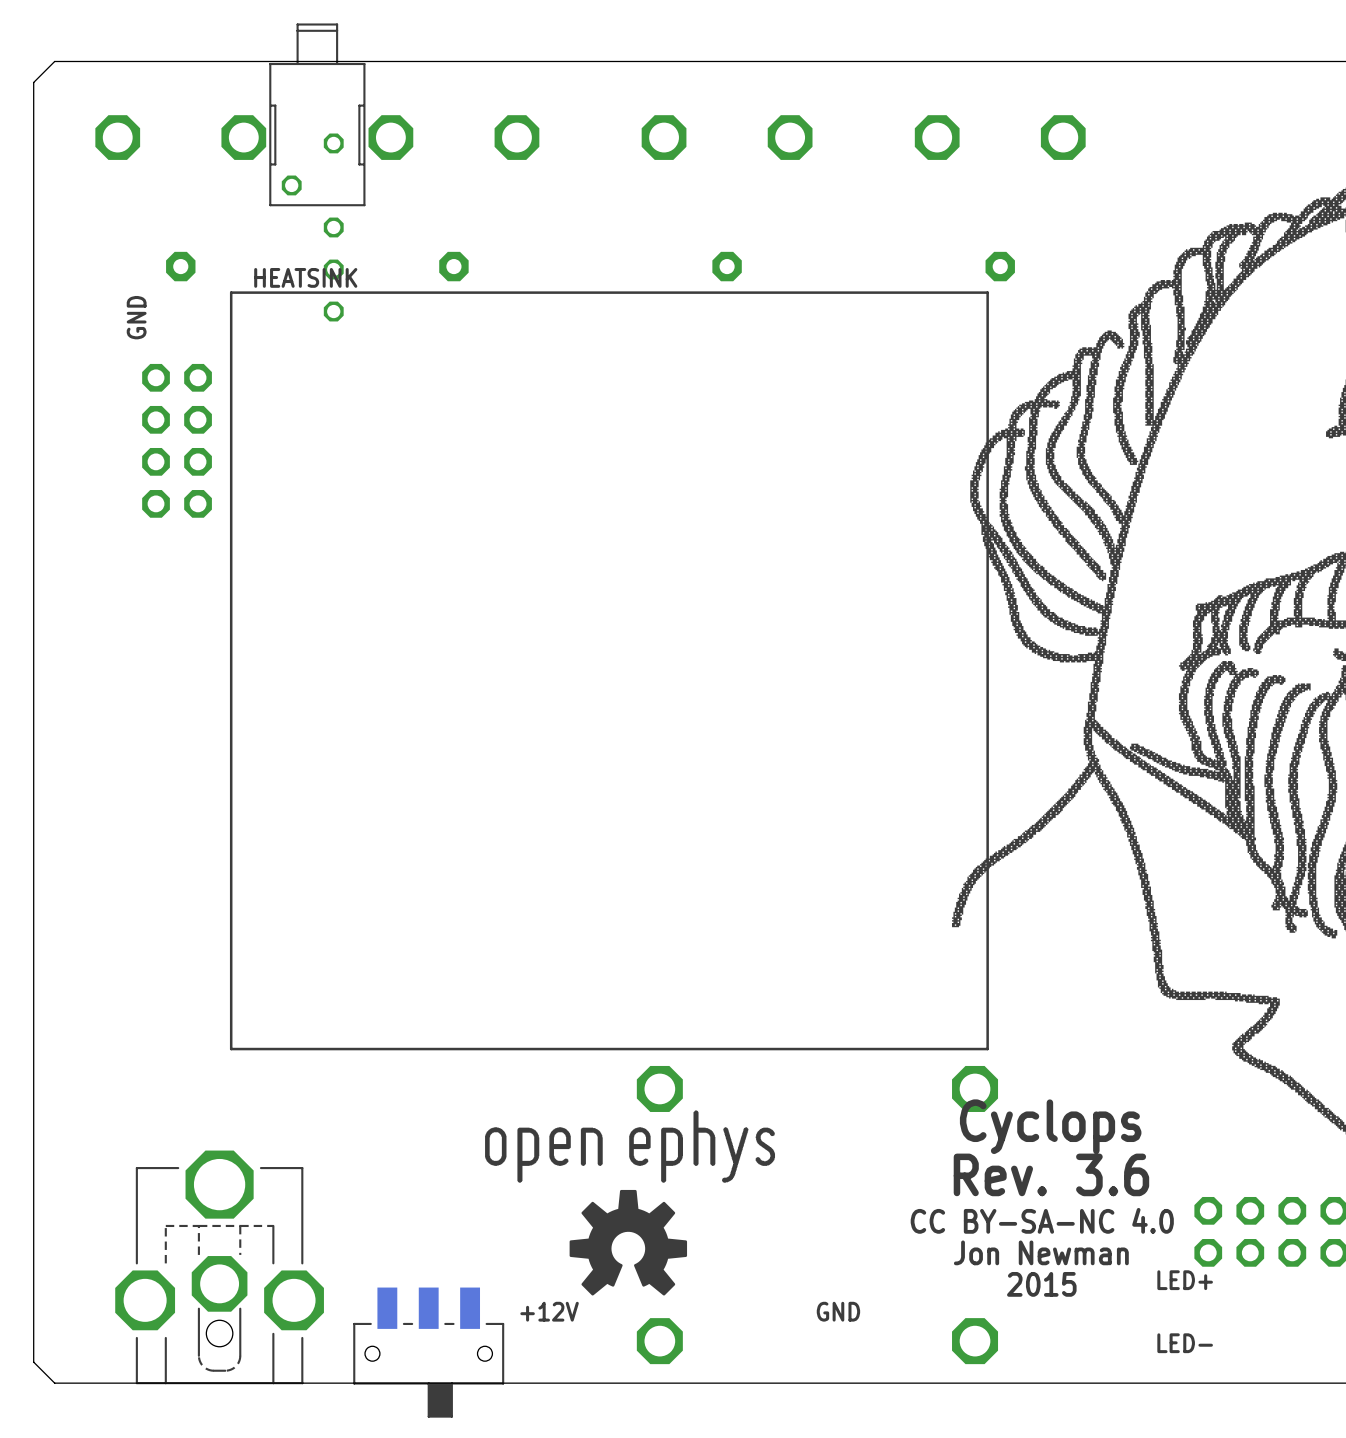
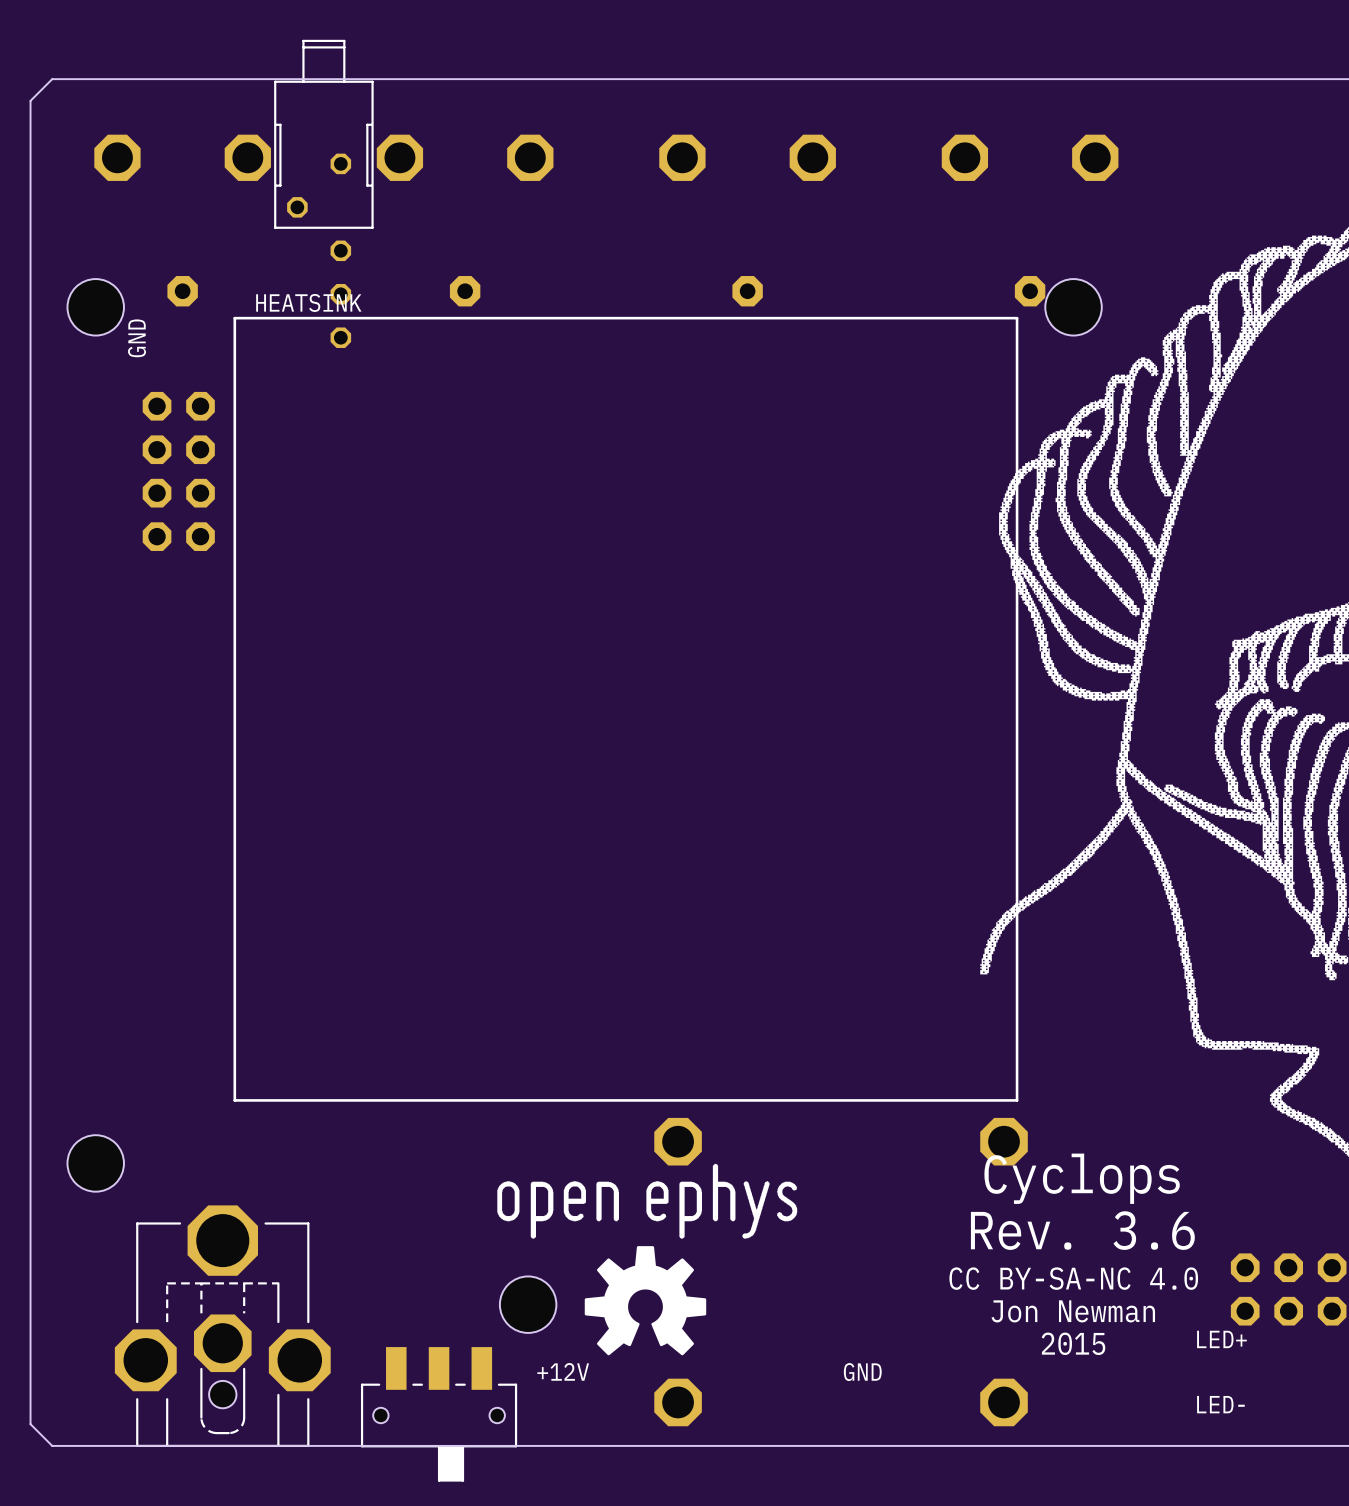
hole: none -> (95, 307)
hole: none -> (1073, 307)
hole: none -> (95, 1163)
hole: none -> (528, 1304)

